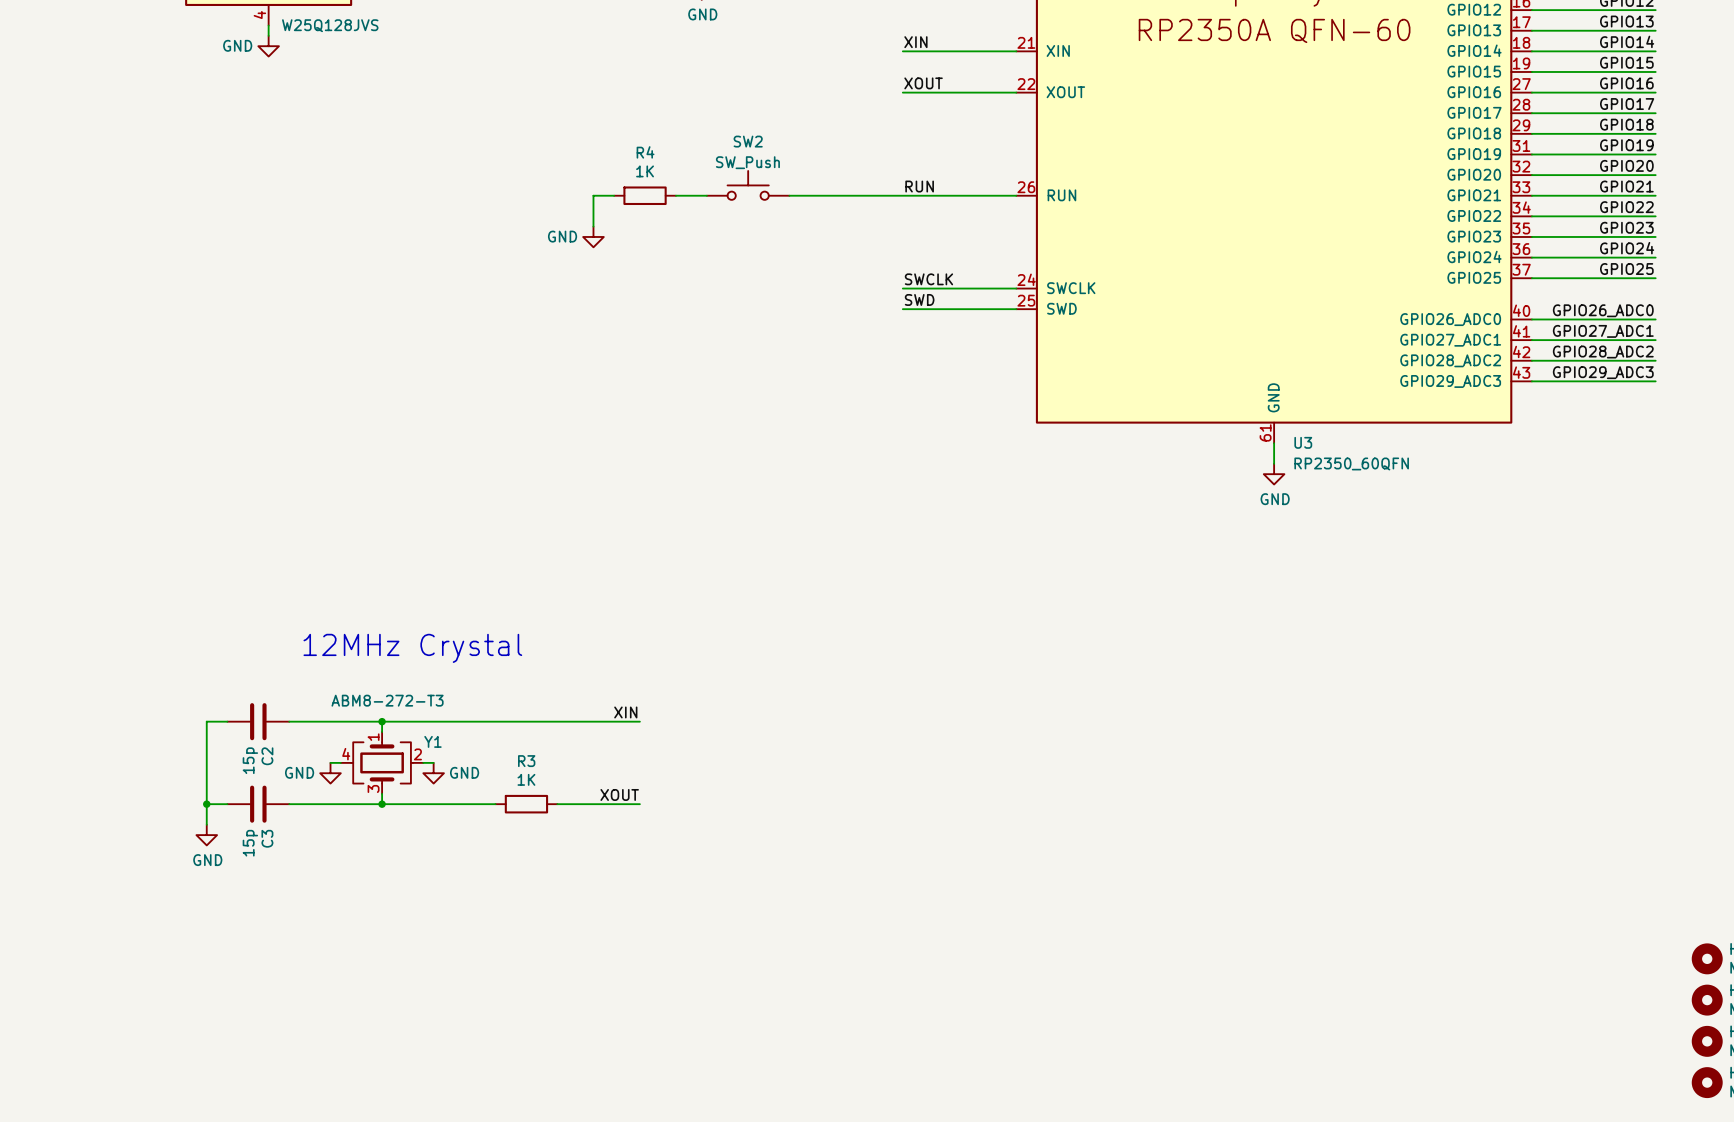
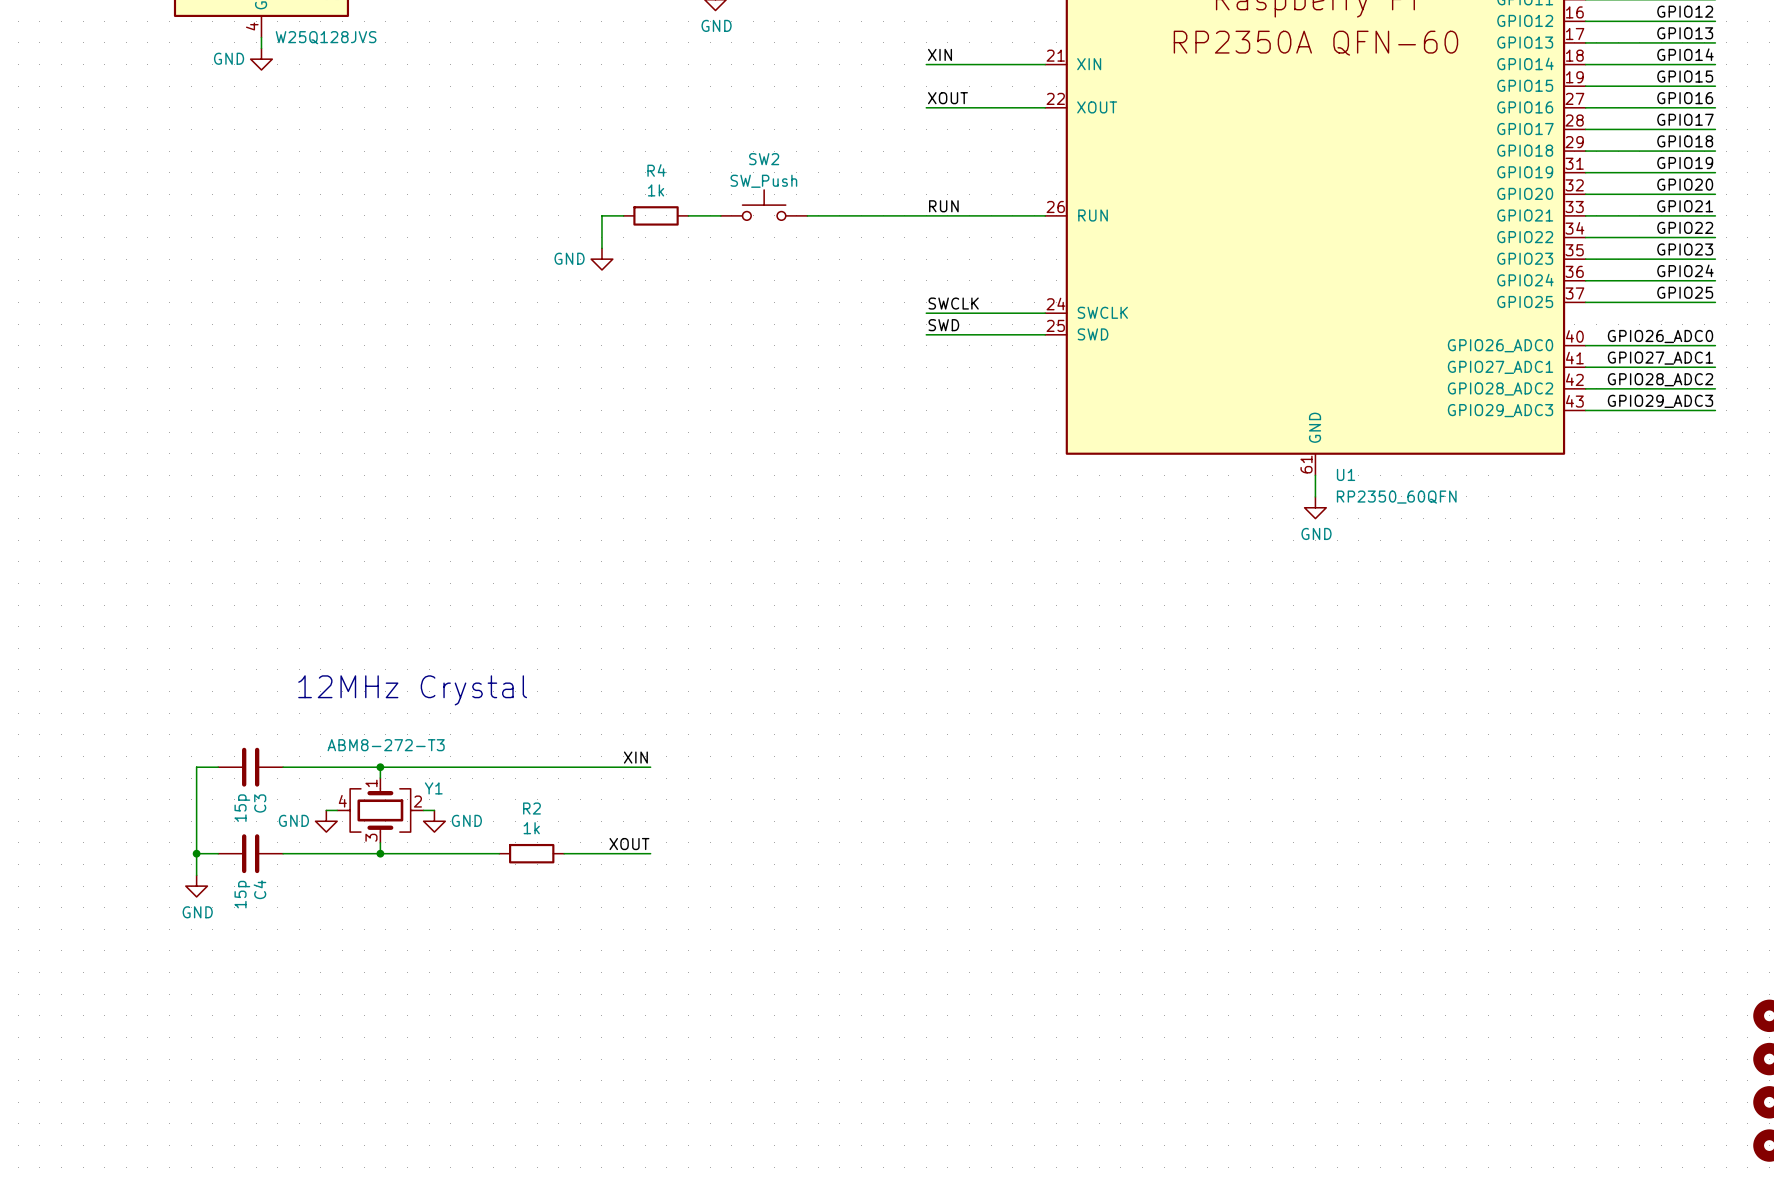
R4 value: 1K (645, 171) -> 1k (656, 190)
U3 name: U3 (1303, 442) -> U1 (1346, 474)
C2 name: C2 (267, 756) -> C3 (260, 803)
R3 name: R3 (526, 761) -> R2 (531, 808)
R3 value: 1K (526, 779) -> 1k (531, 828)
C3 name: C3 (267, 838) -> C4 (259, 889)

